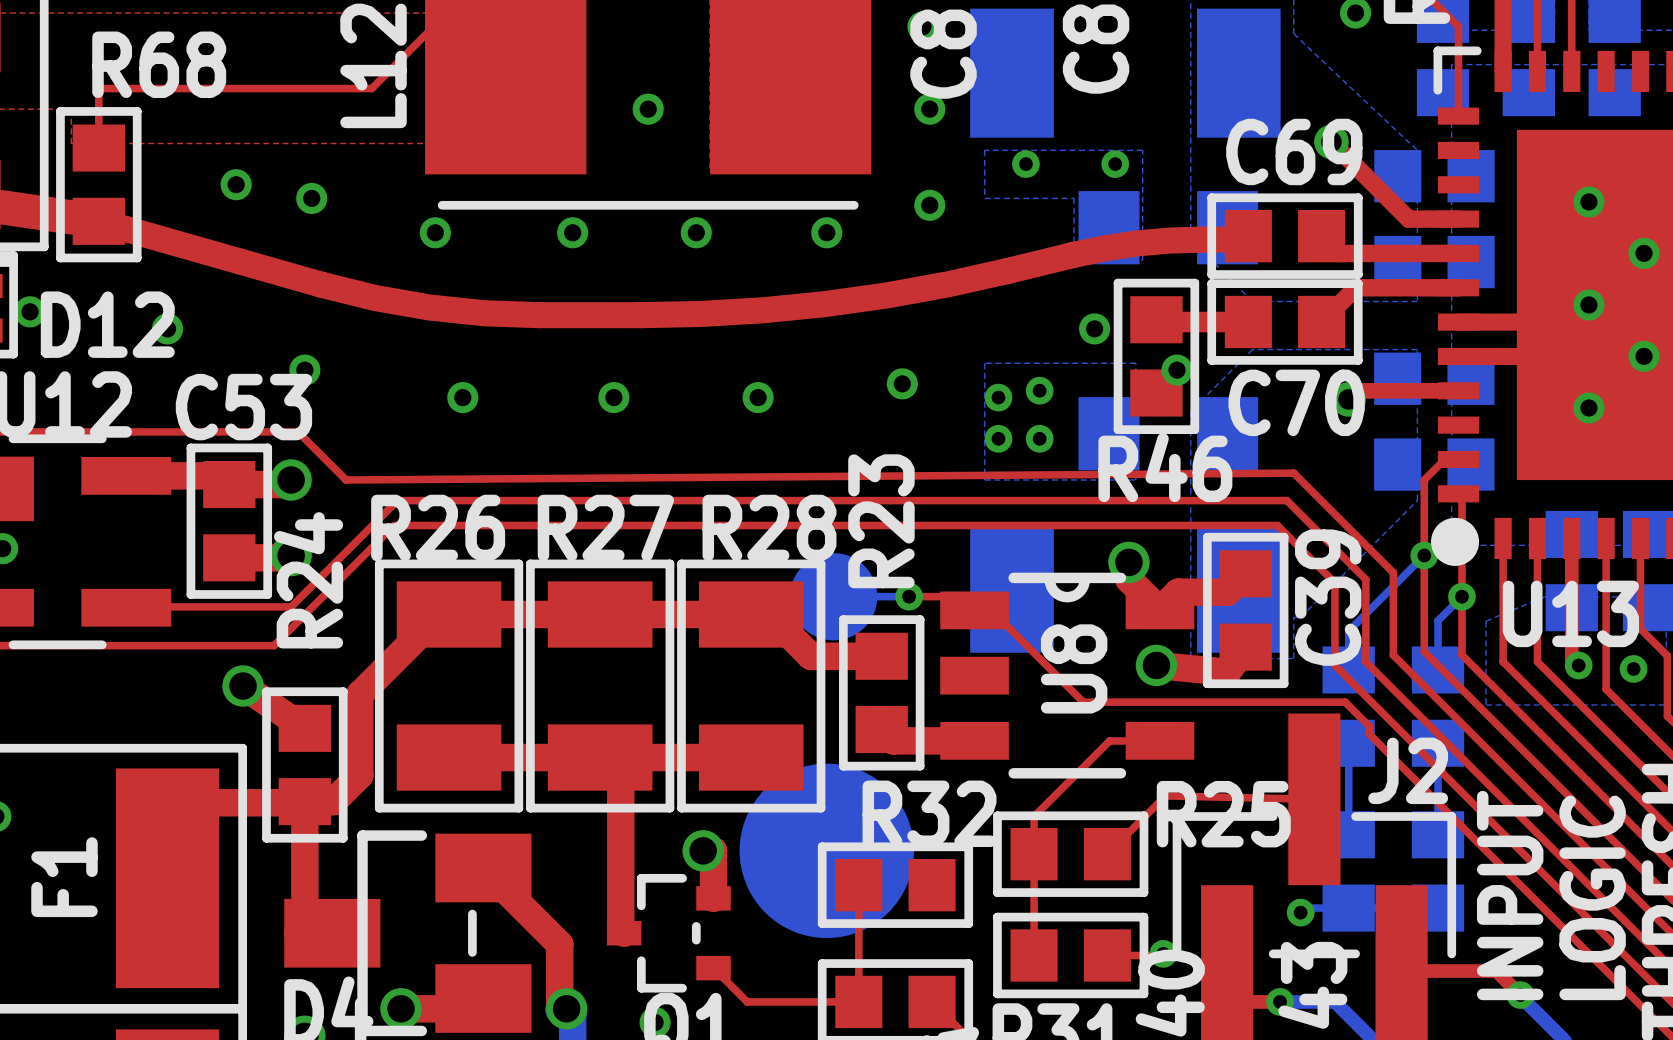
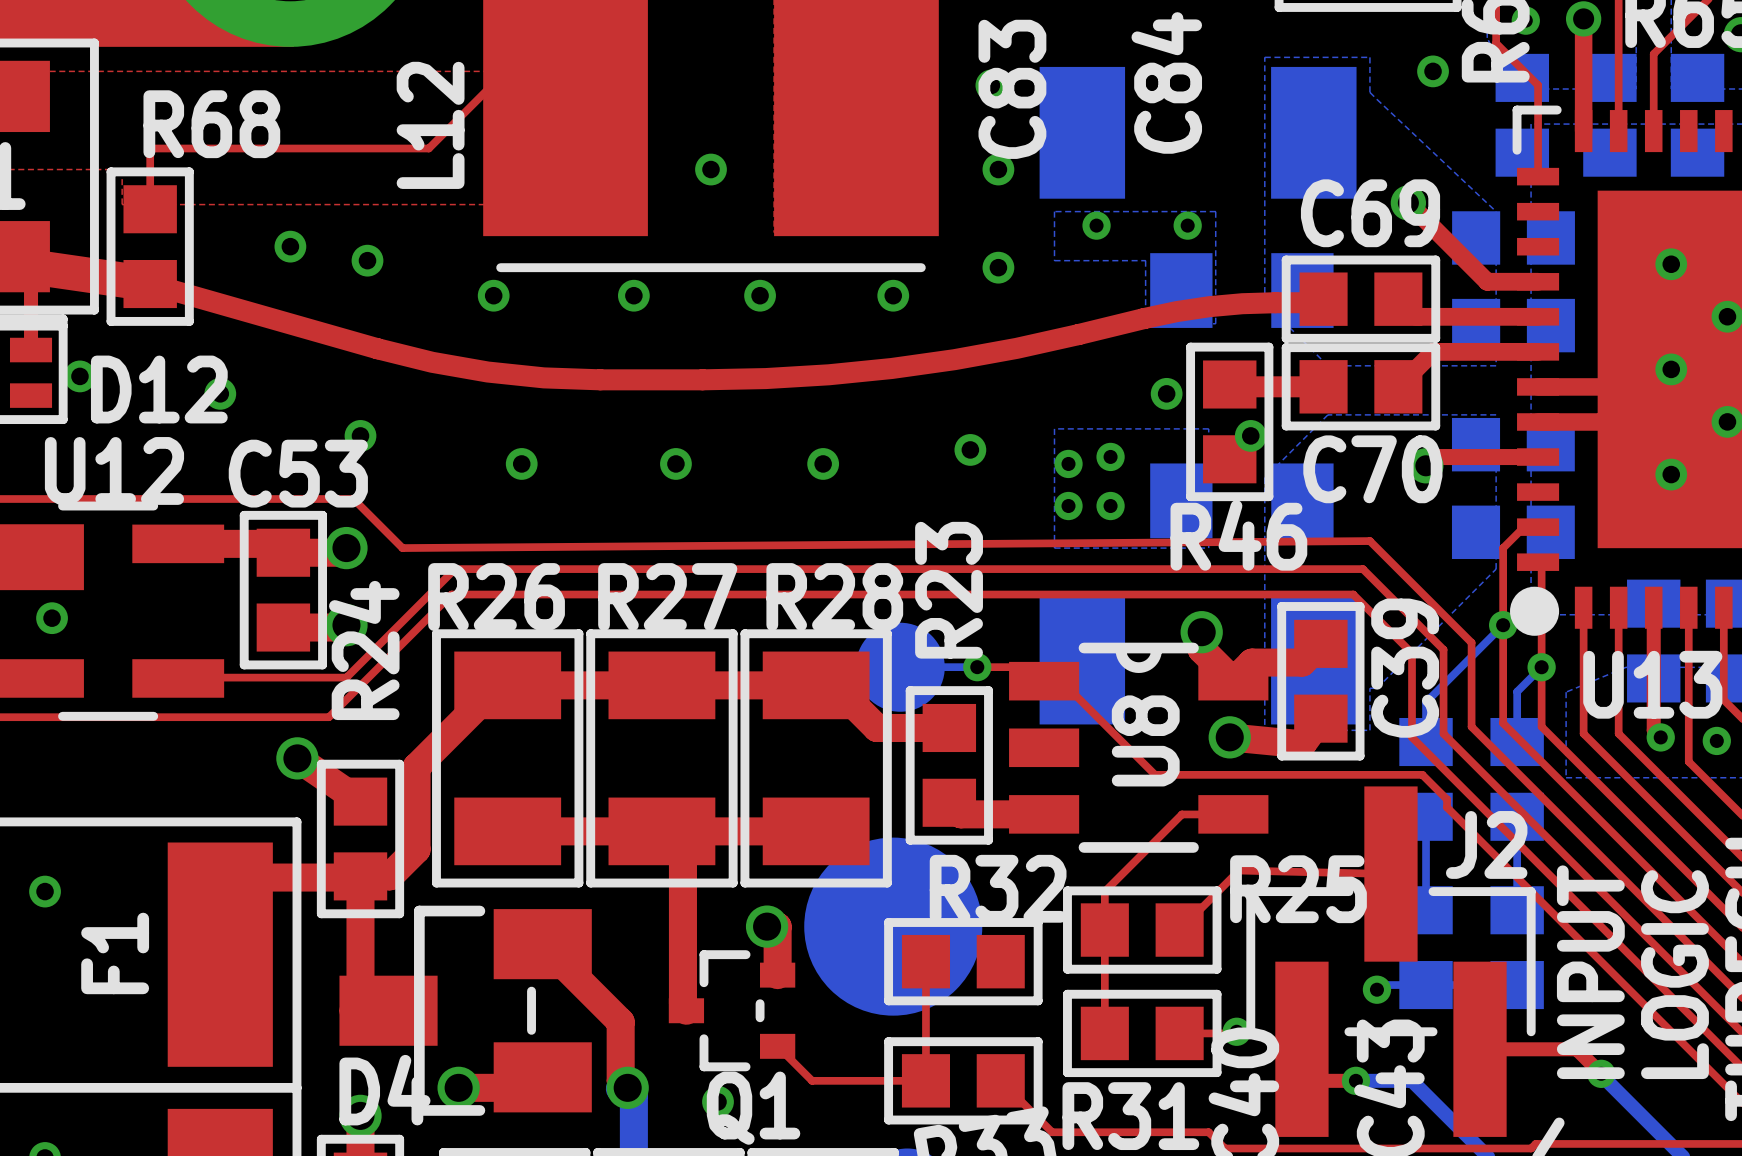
top track width: thick (98, 221) (321, 284) (375, 297) (429, 307) (484, 313) (539, 315) (701, 313) (825, 304) (947, 284) (1104, 248) (1168, 240) (1244, 239) -> thin (150, 284) (377, 348) (432, 362) (487, 372) (543, 377) (600, 379) (765, 378) (891, 368) (1016, 348) (1176, 311) (1242, 303) (1320, 302)

